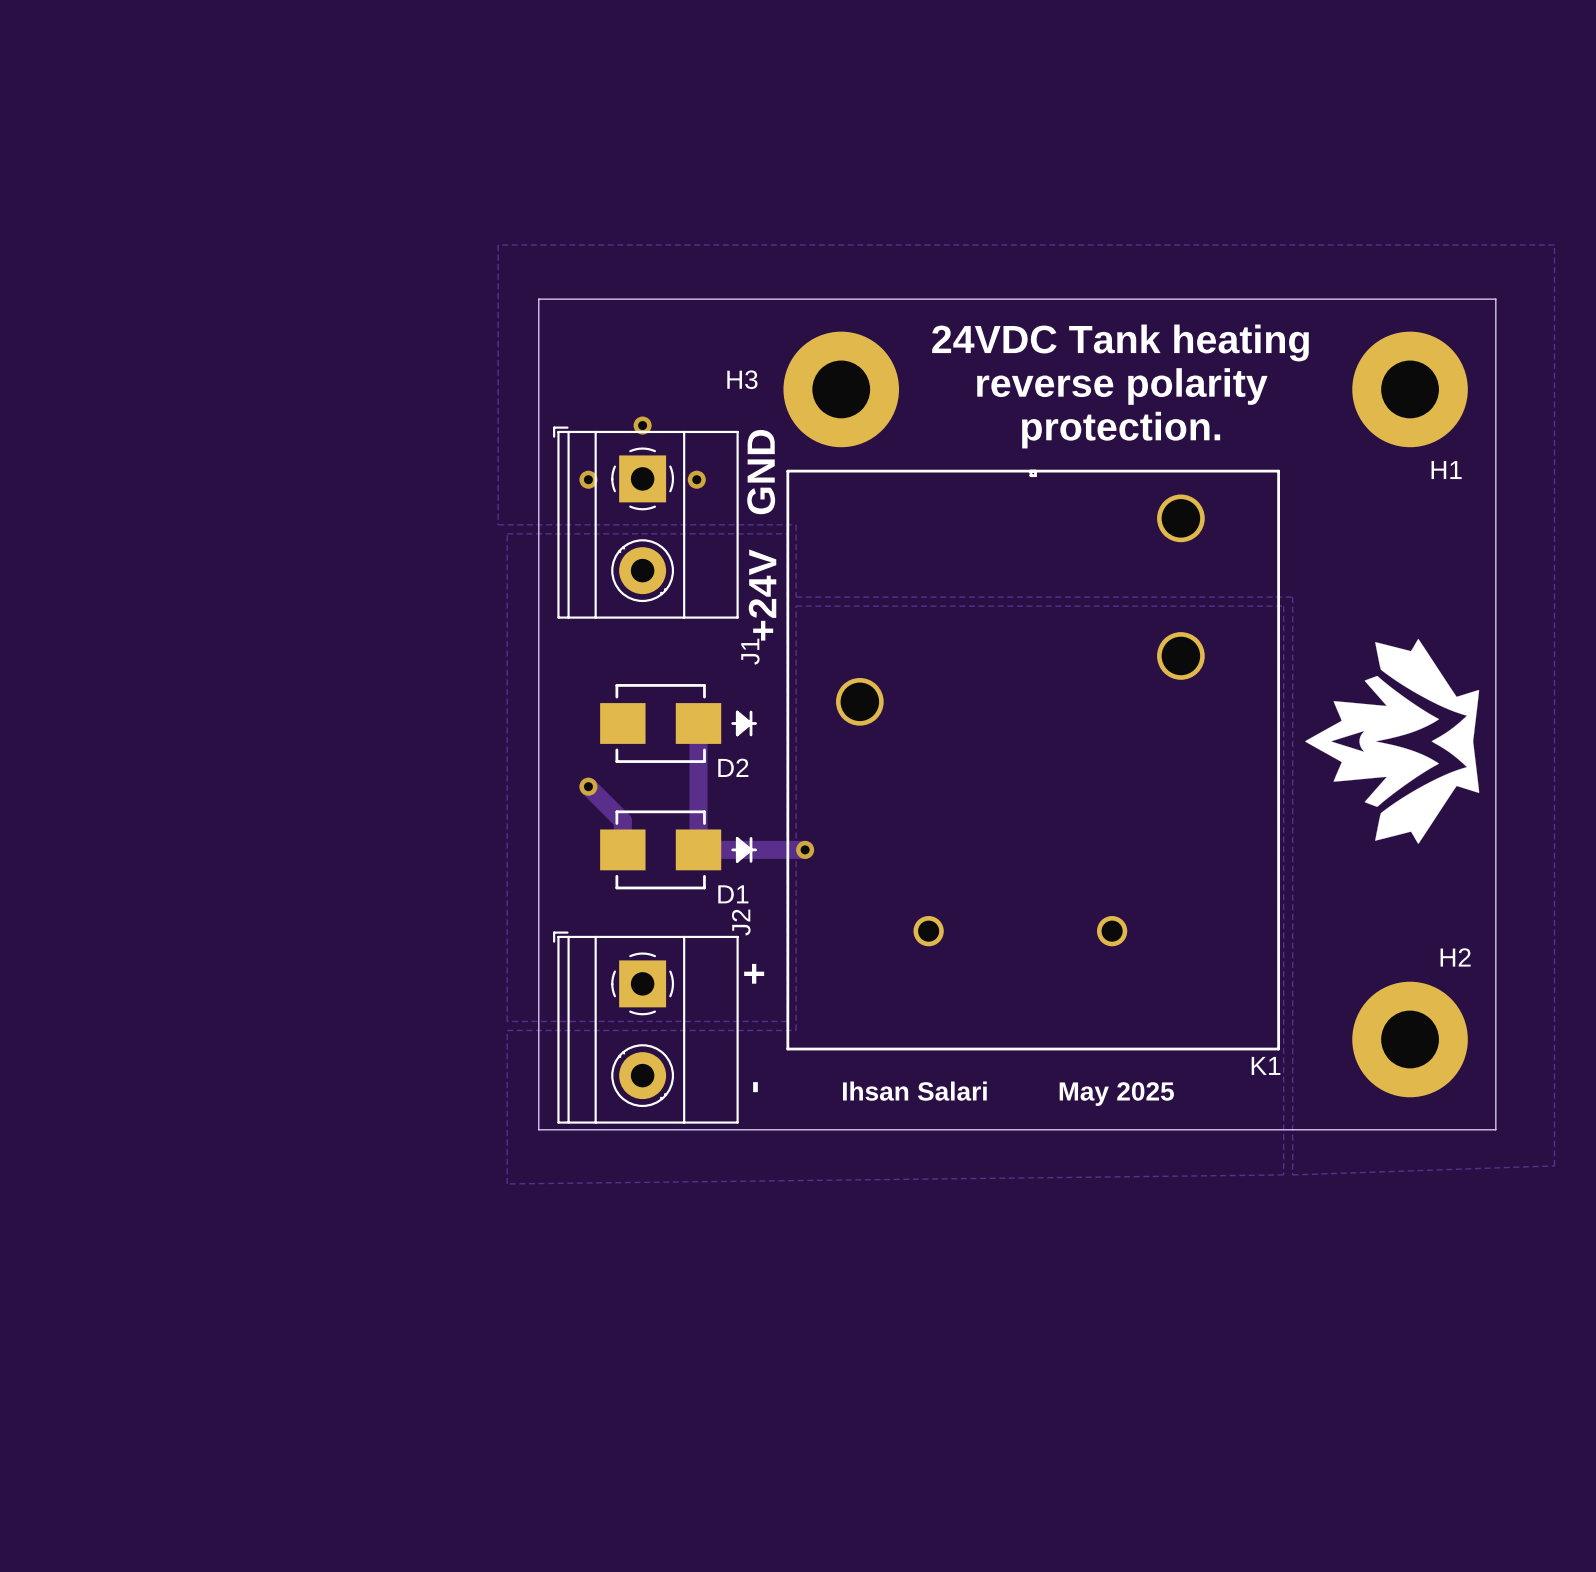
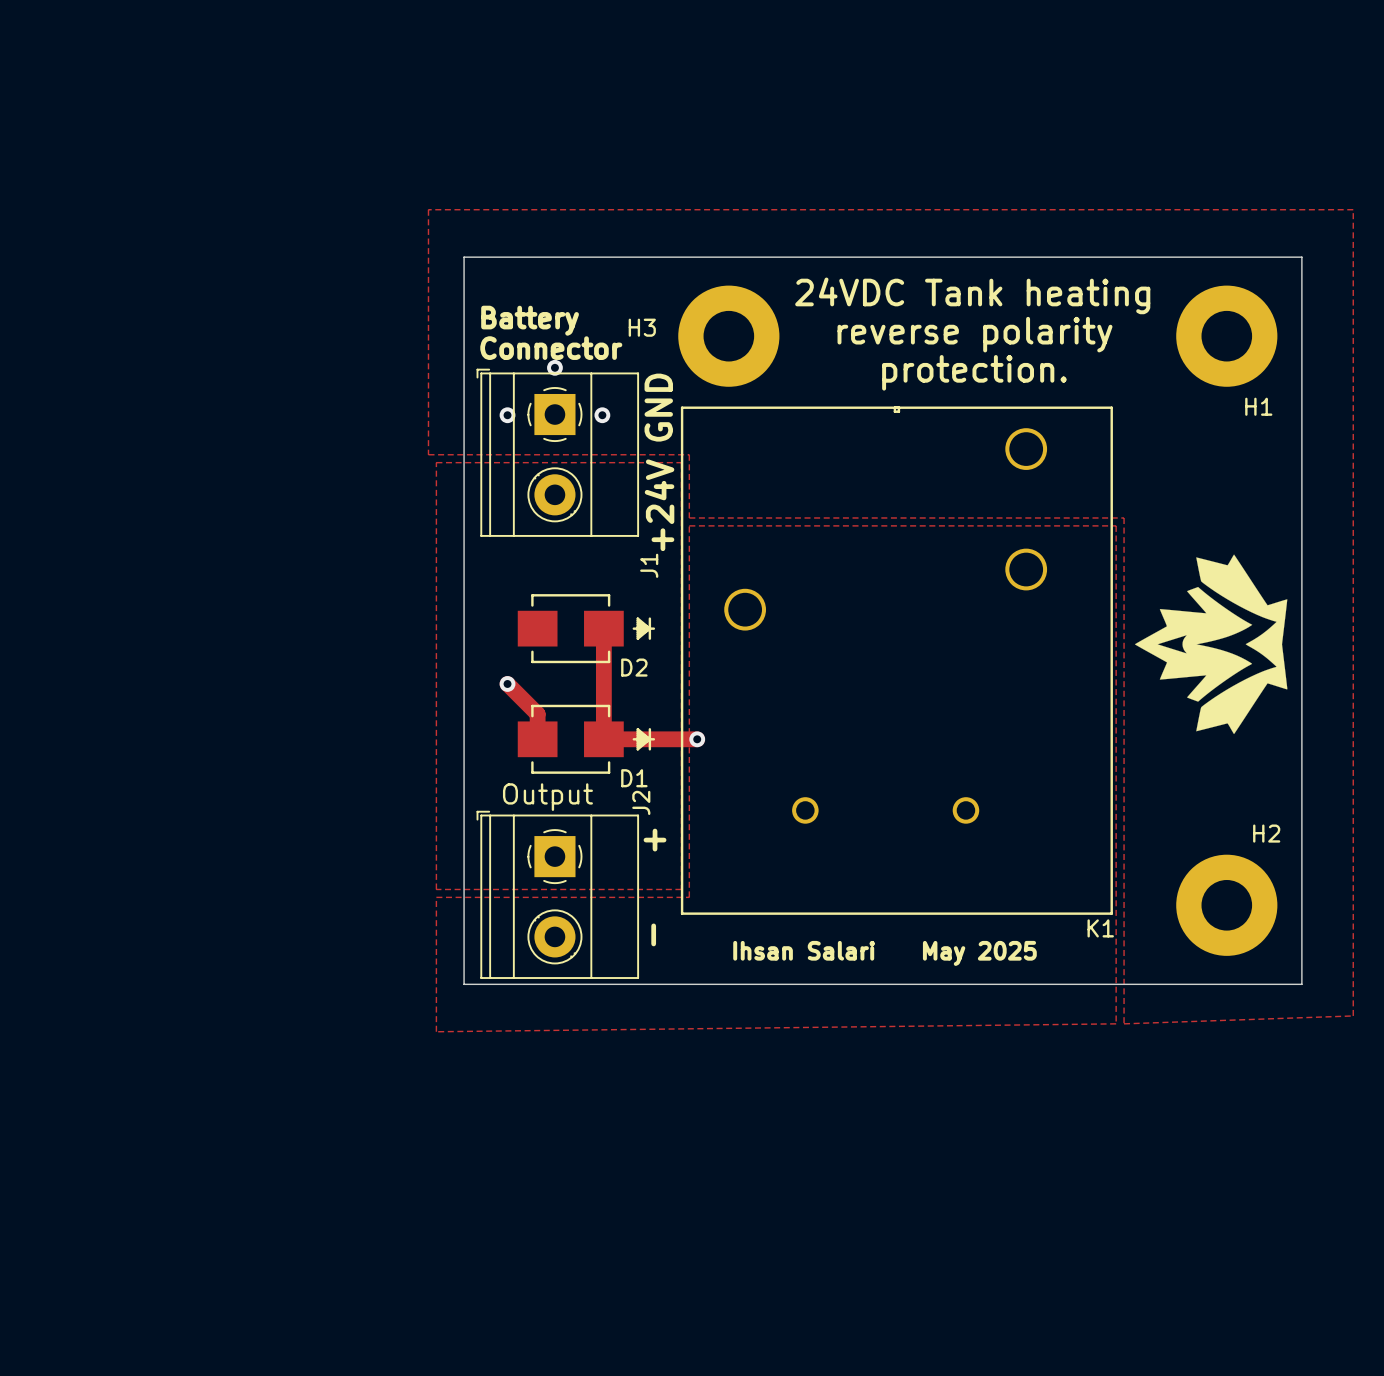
text: none -> Battery (530, 320)
text: none -> Connector (551, 348)
J2 value: none -> Output (547, 797)

